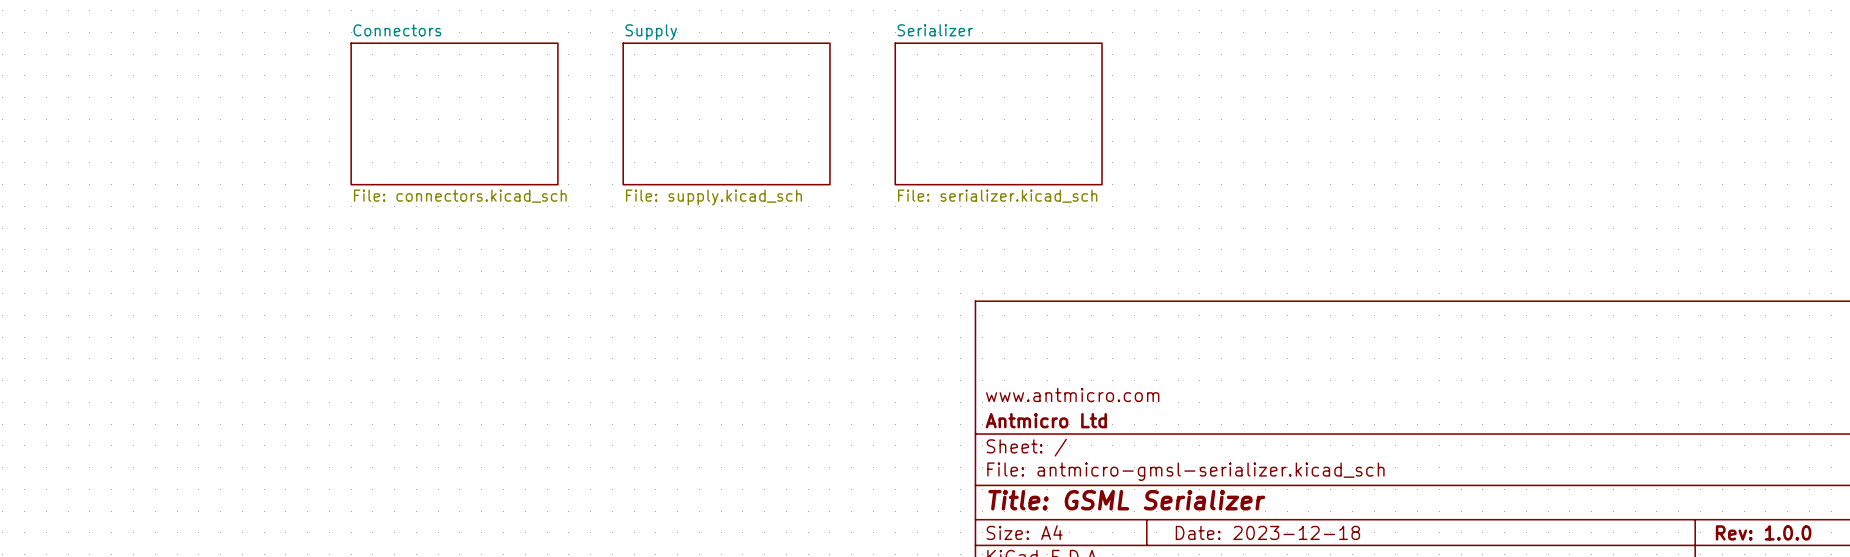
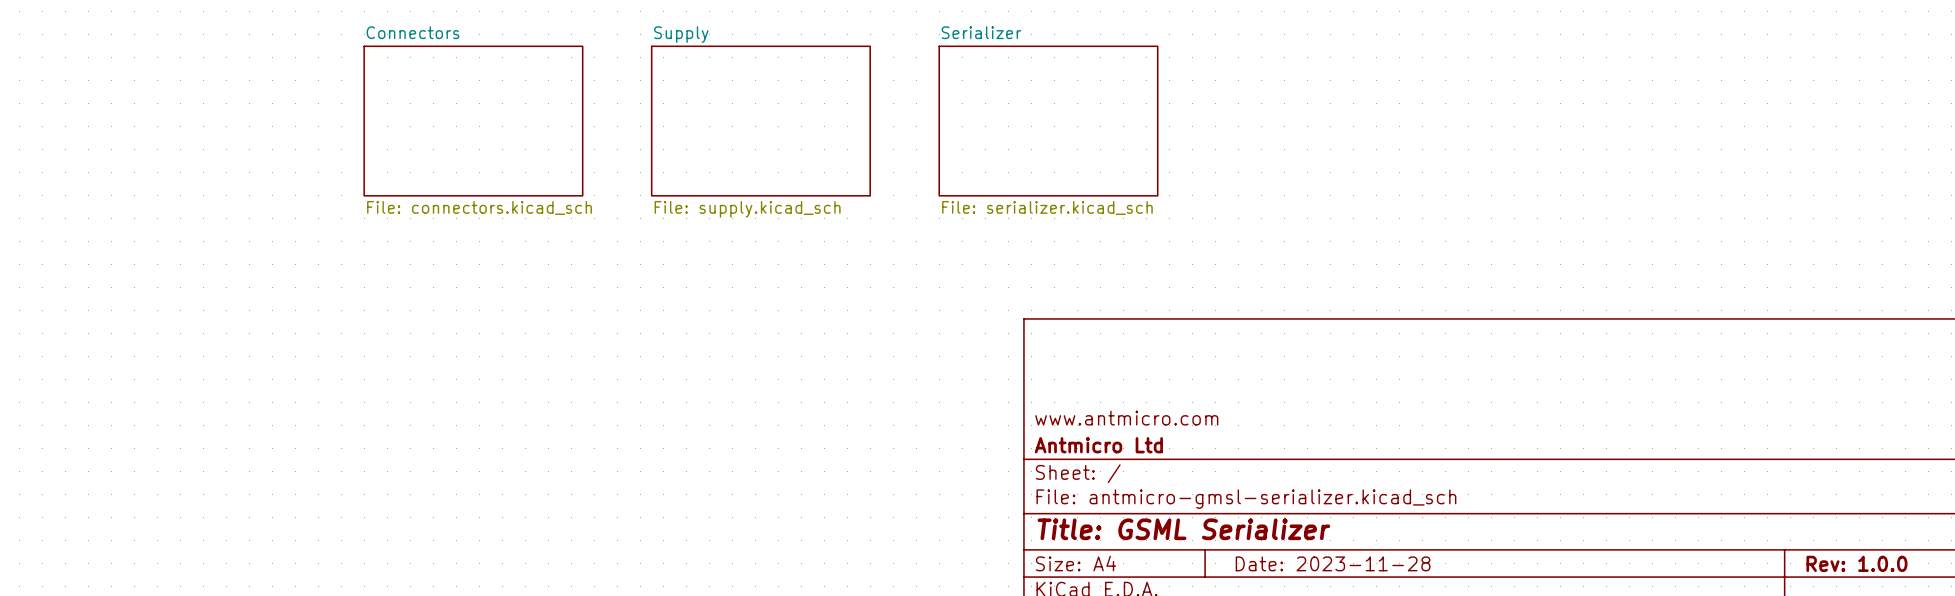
title block: Date: 2023-12-18 (1267, 532) -> Date: 2023-11-28 (1333, 563)

